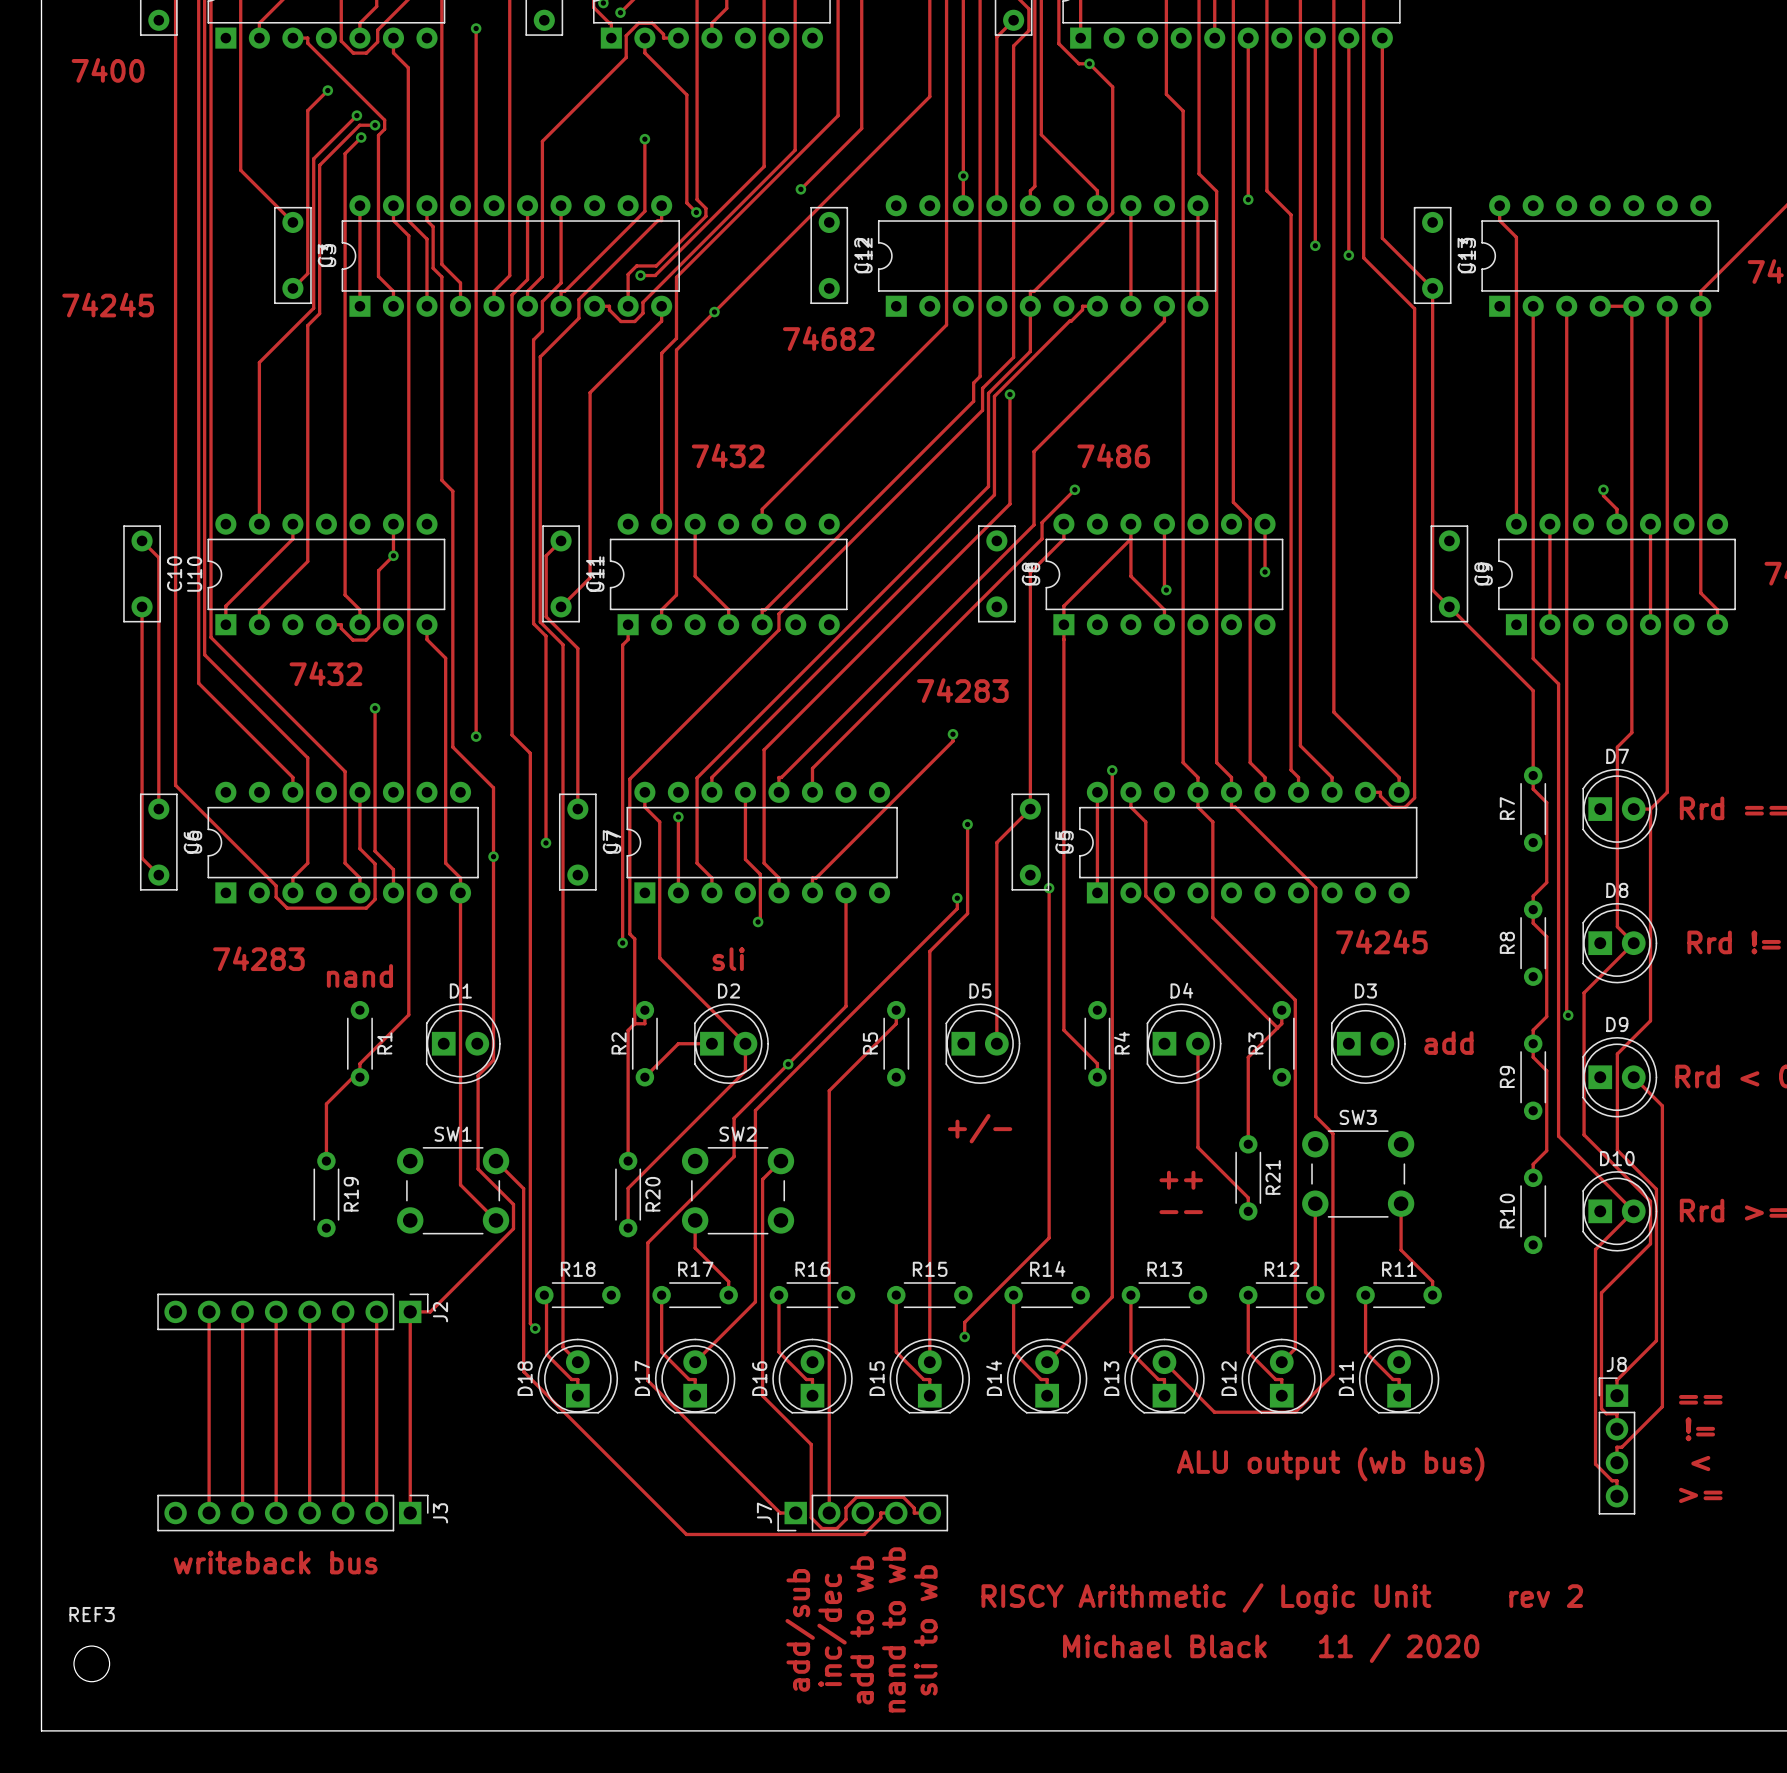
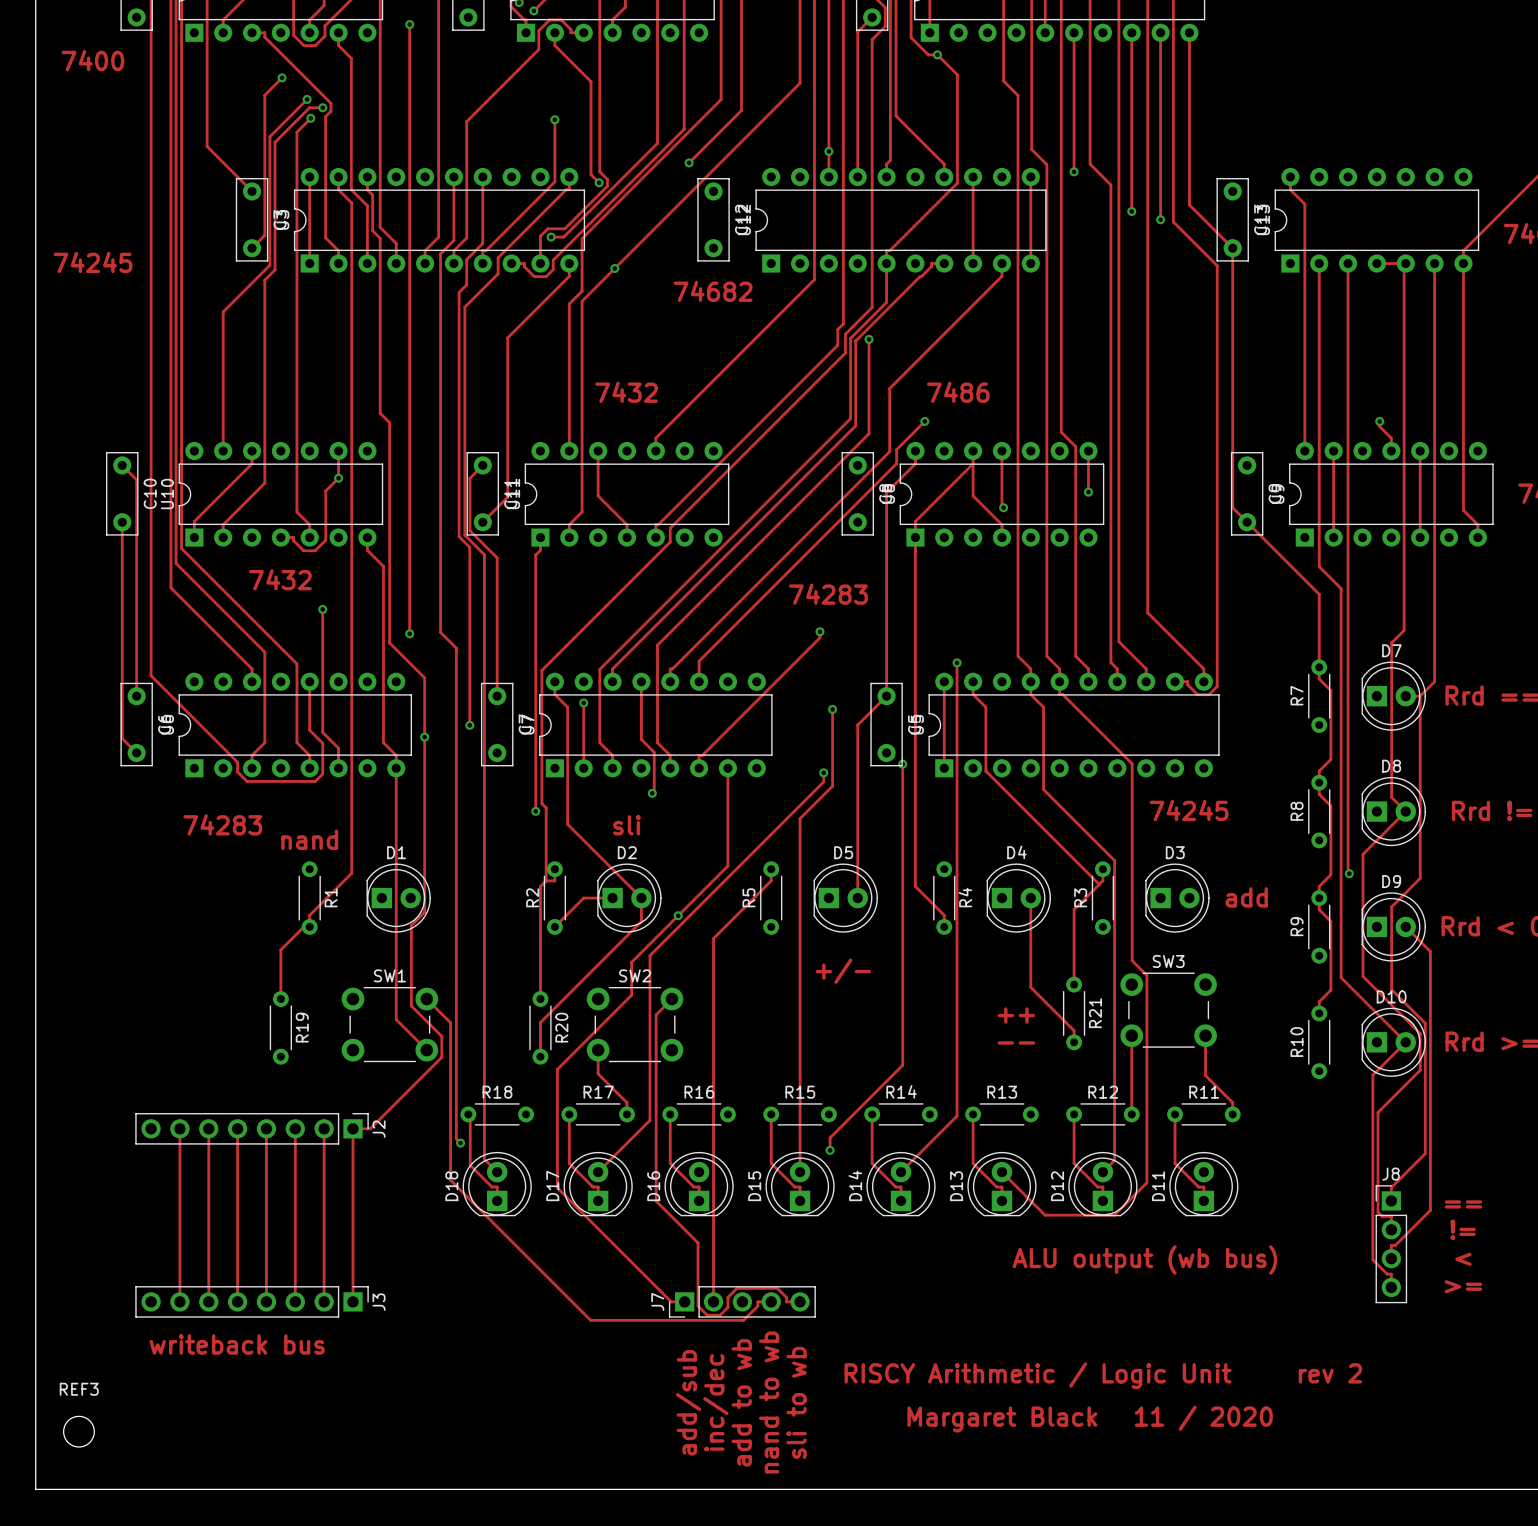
text: Michael Black (1164, 1646) -> Margaret Black (1002, 1419)

